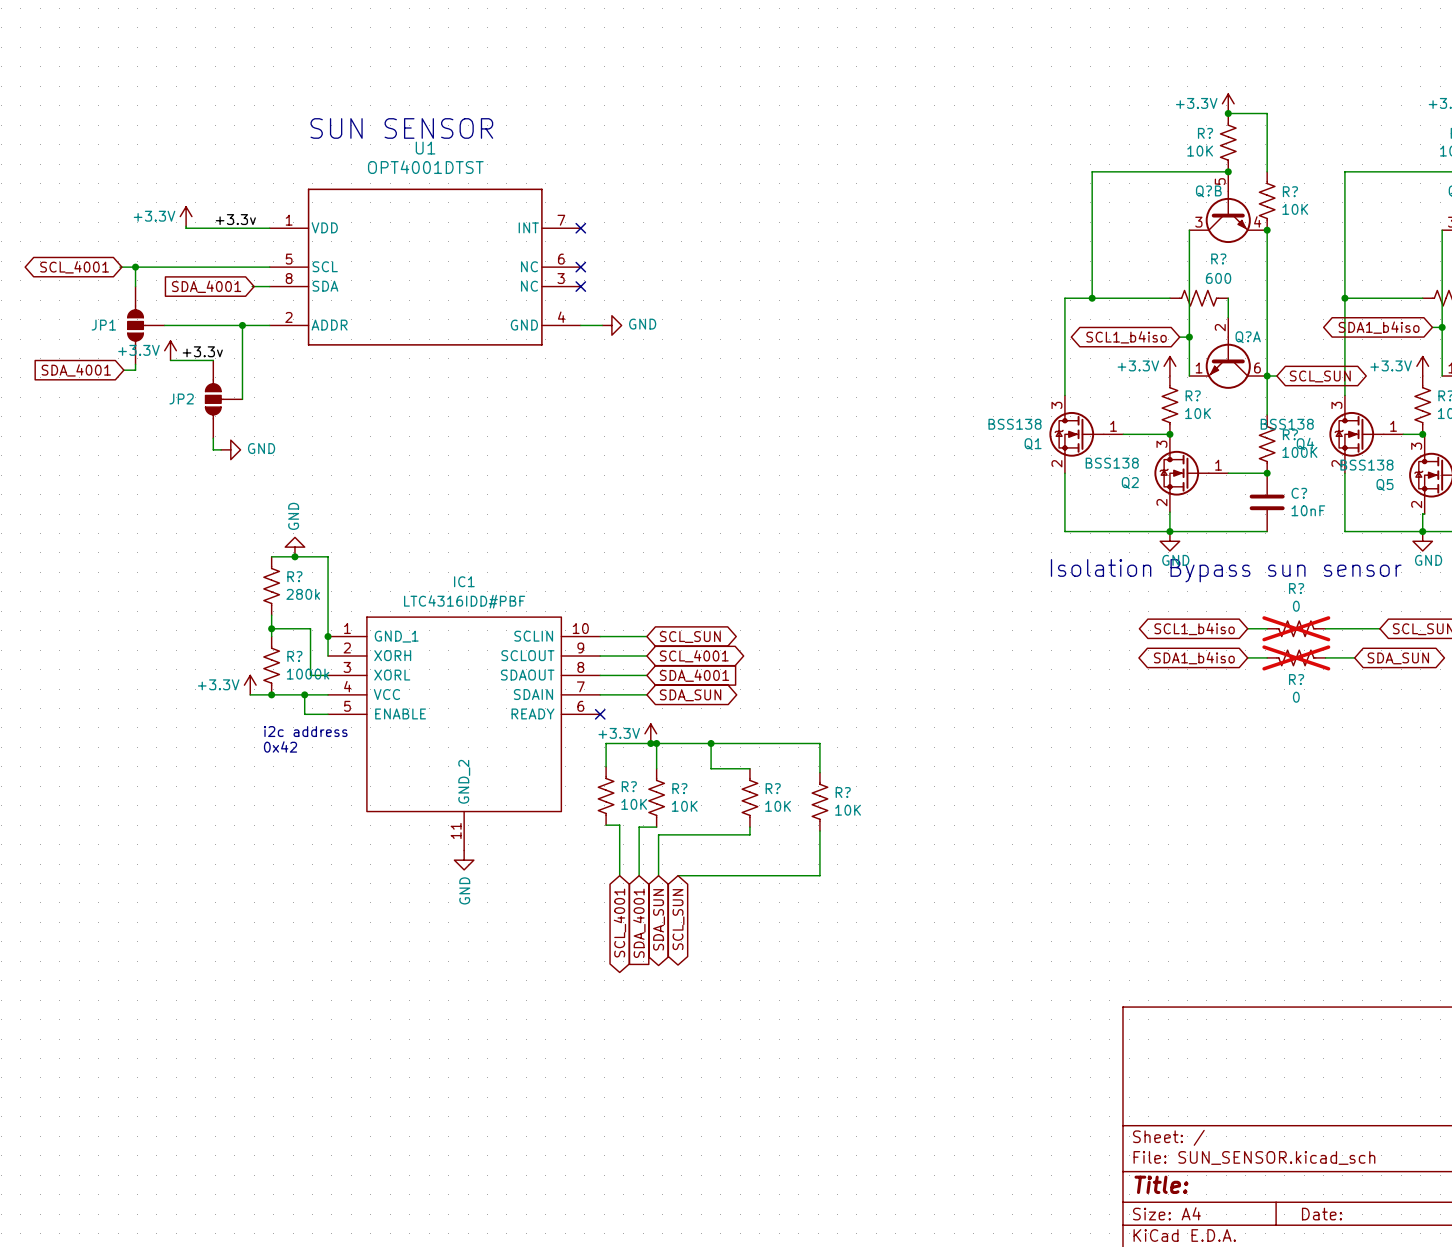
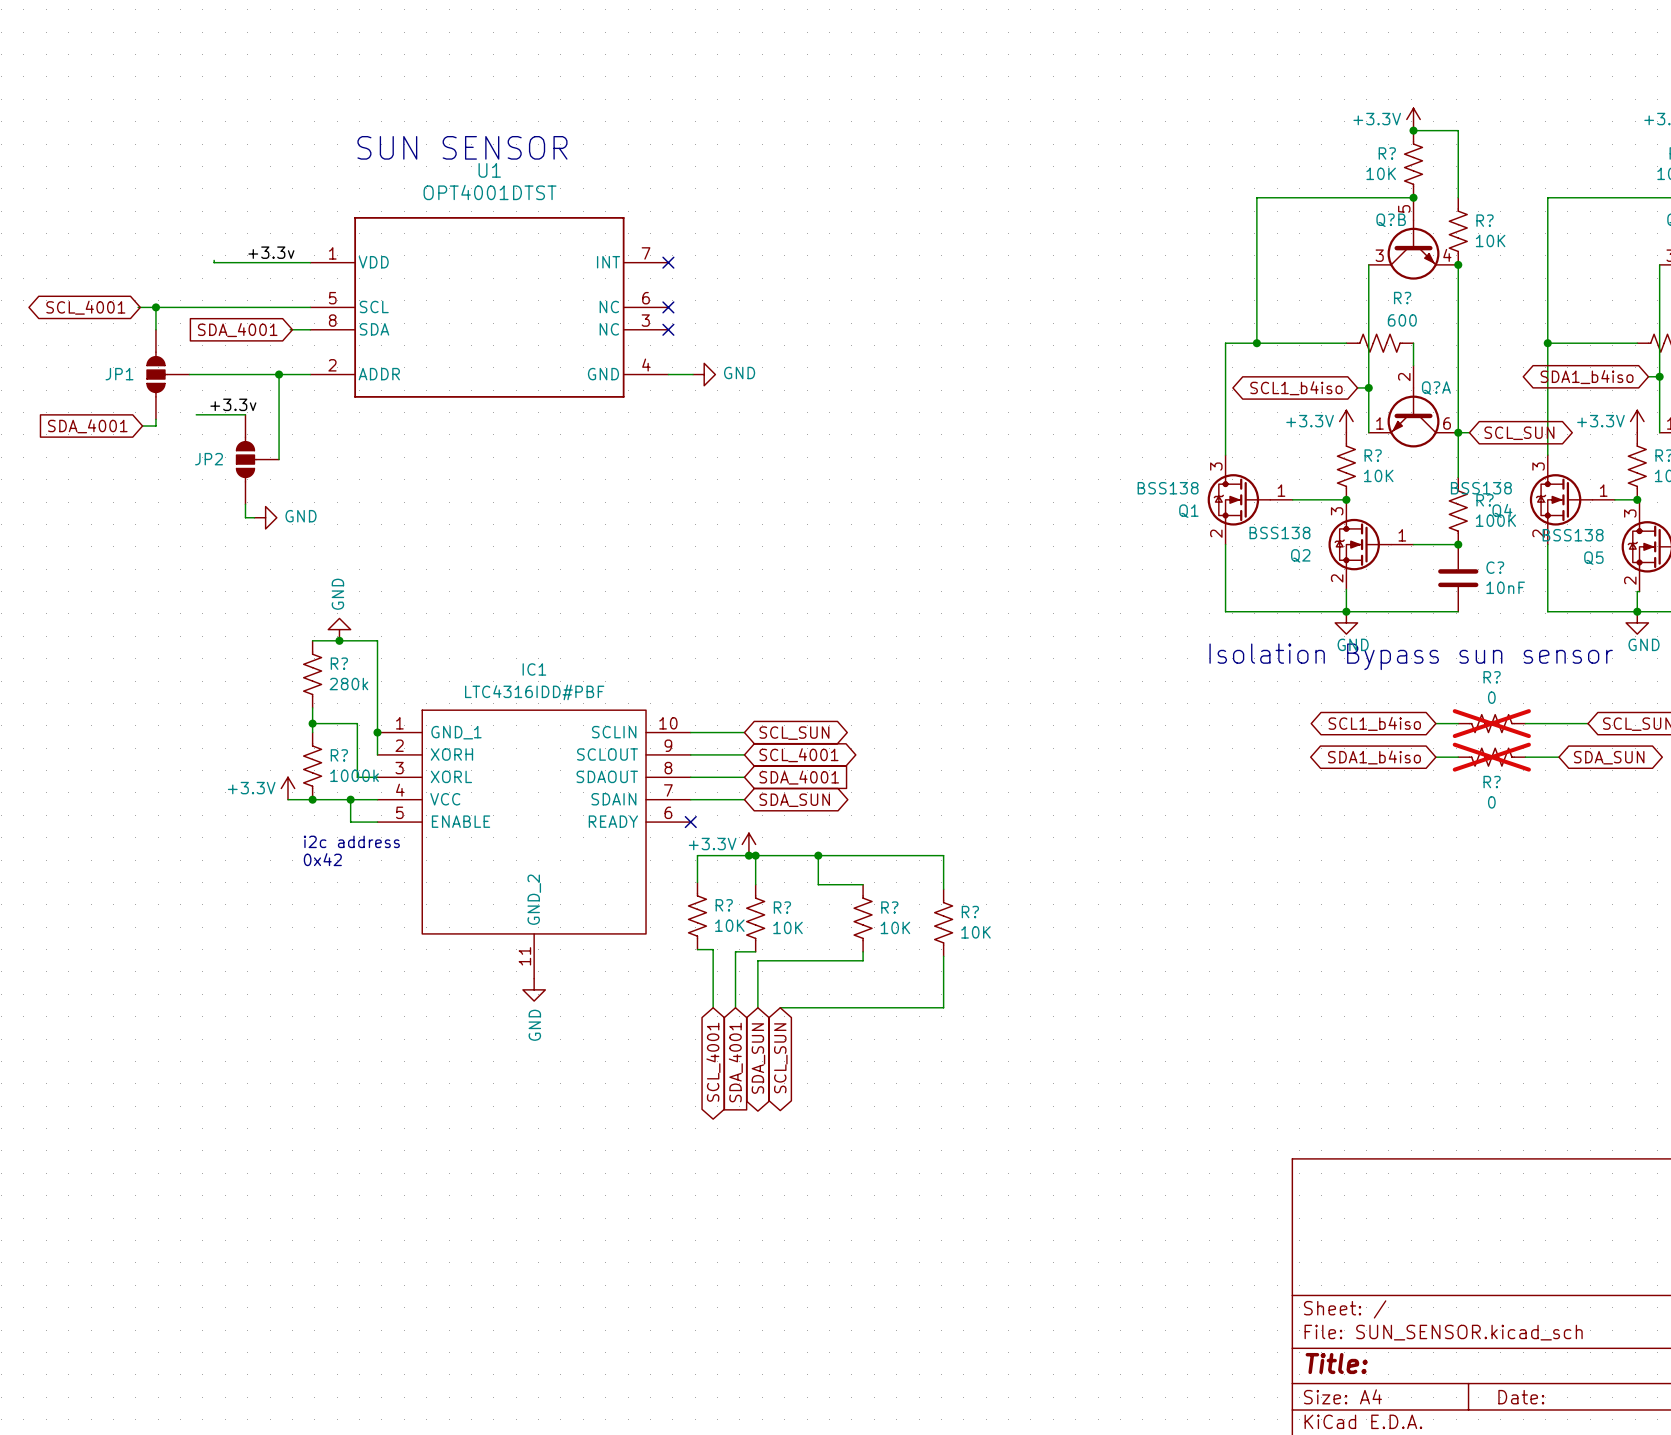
power symbol: +3.3V (186, 216) -> none
power symbol: +3.3V (170, 350) -> none

